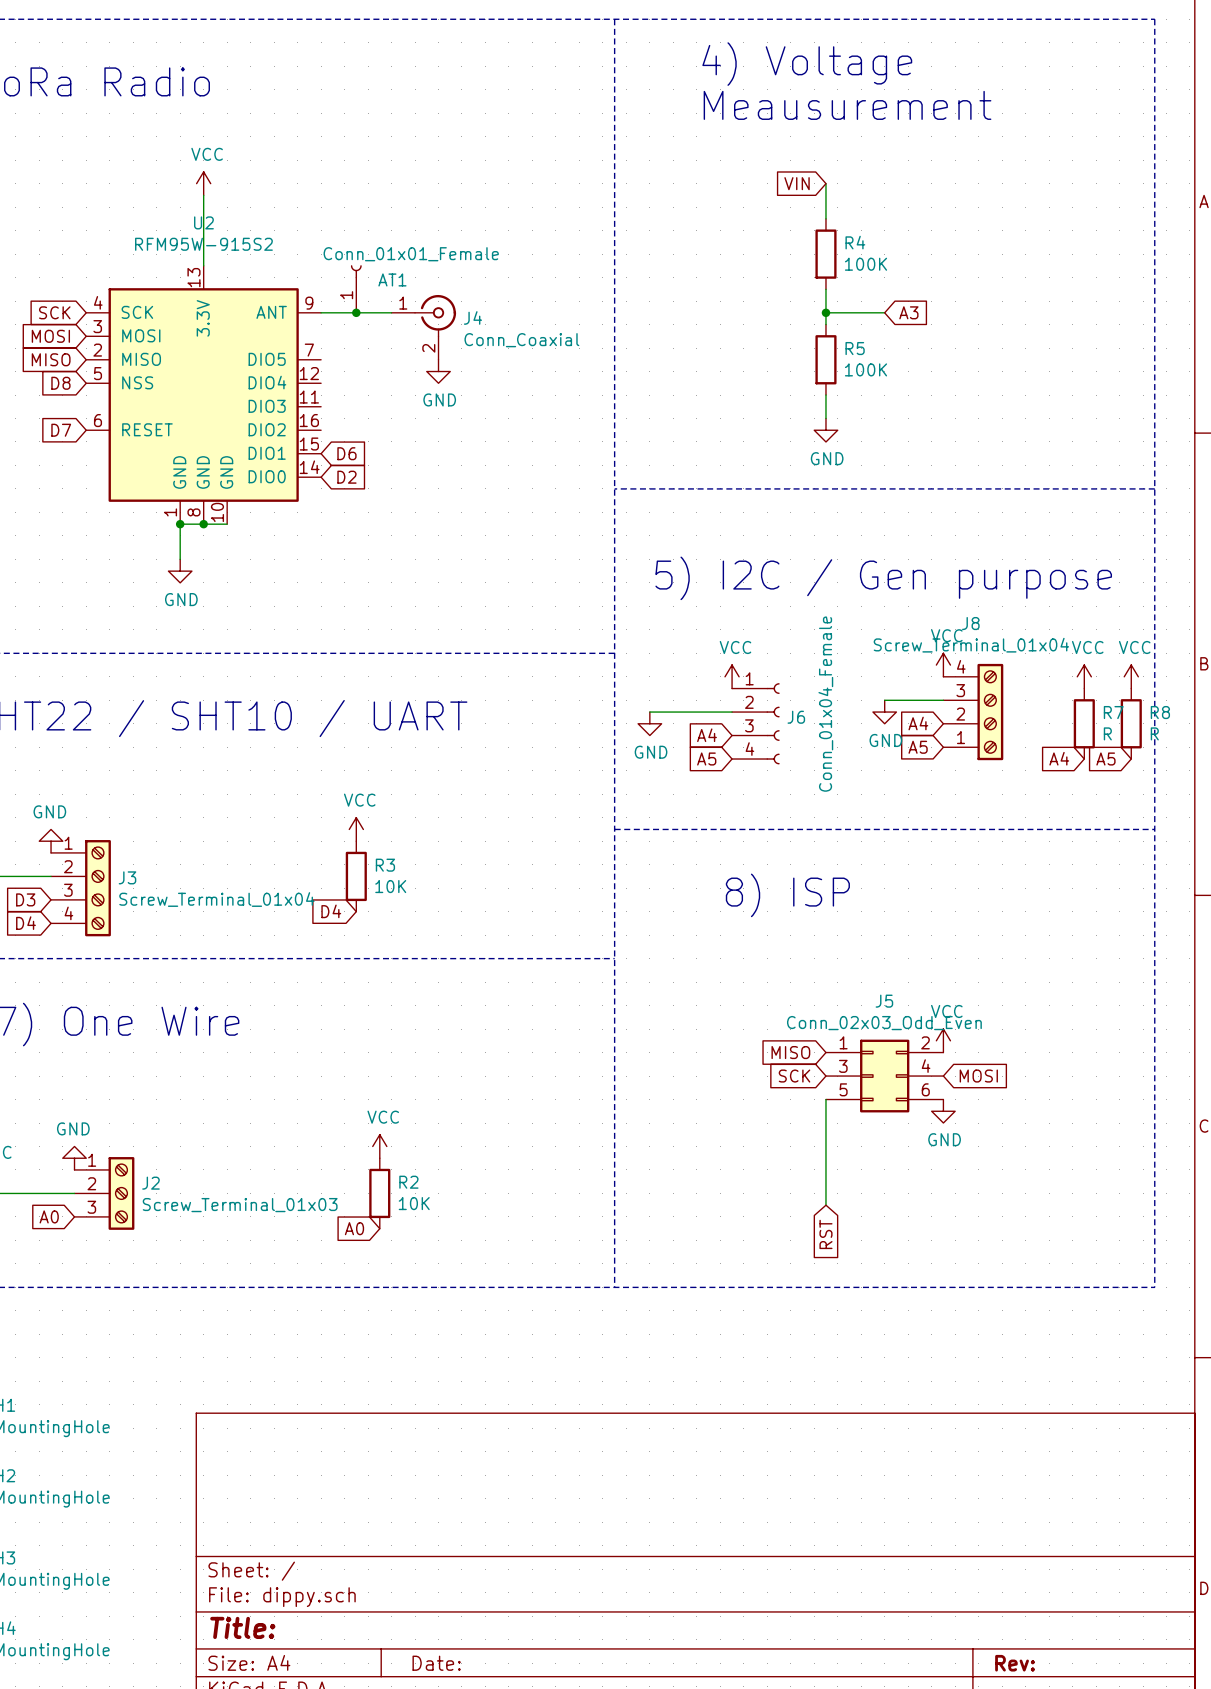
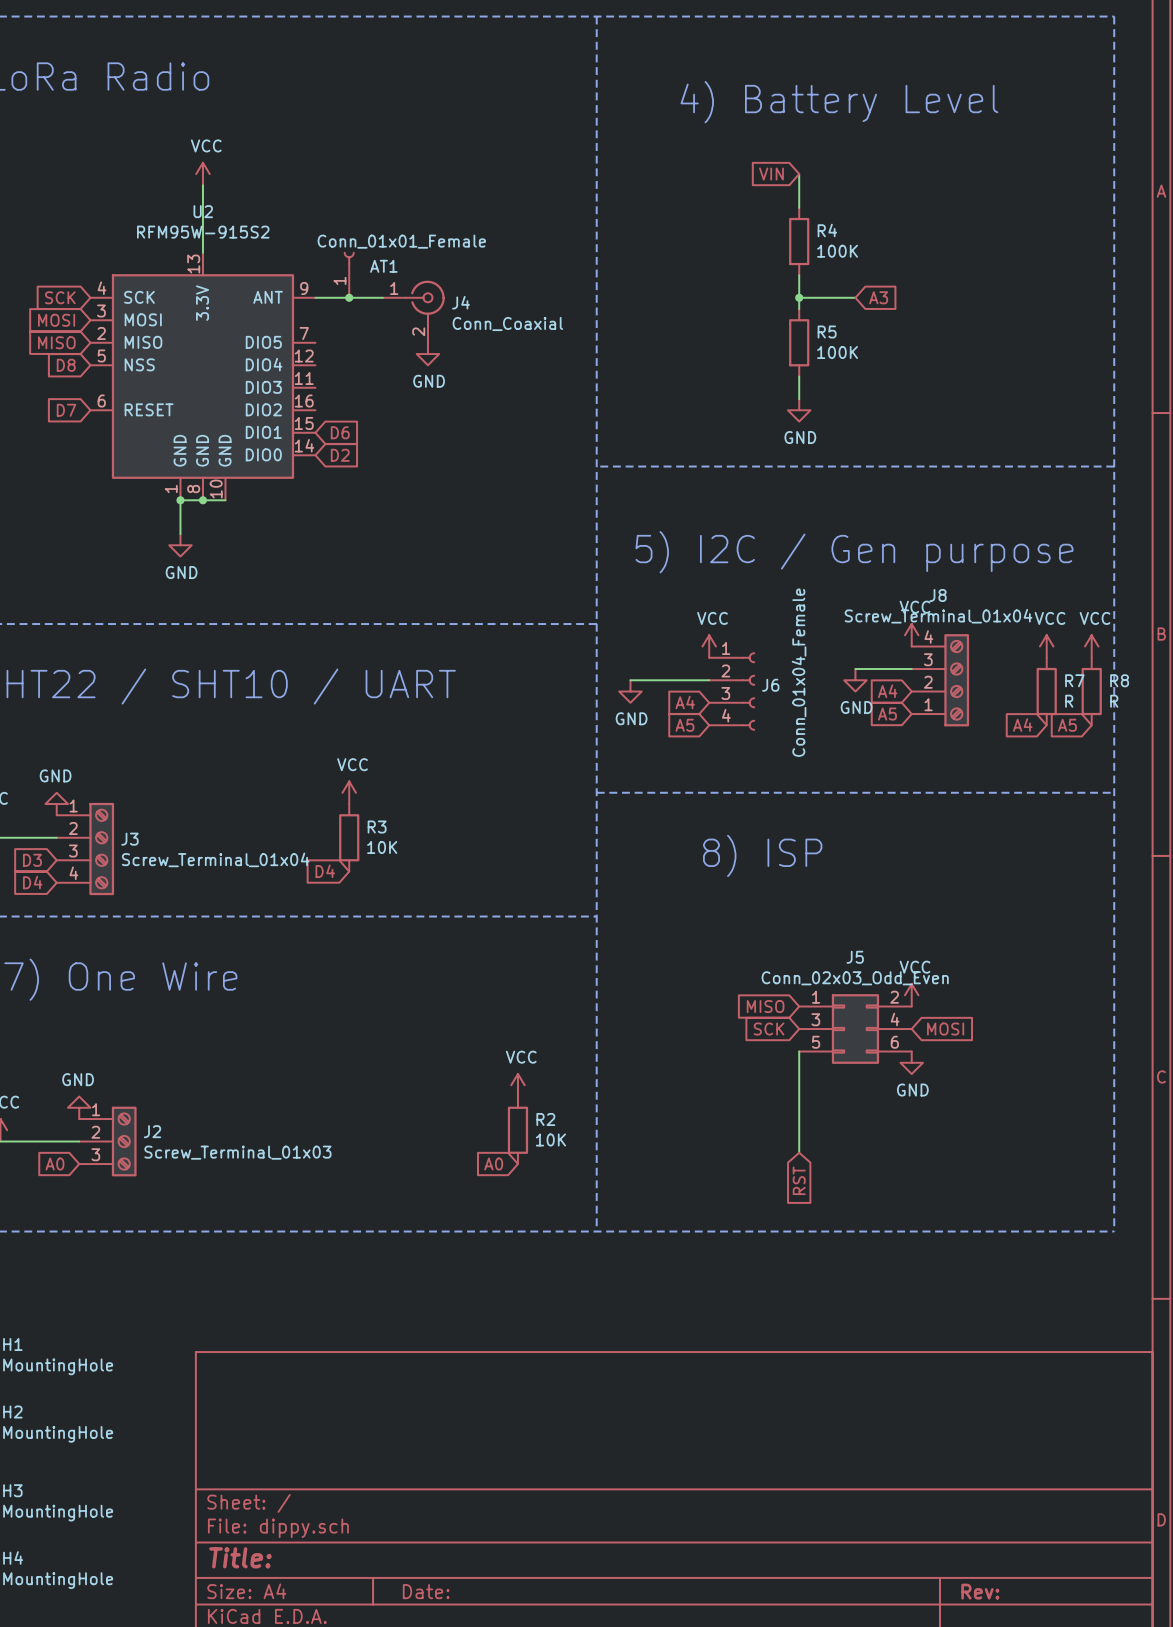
text: 4) Voltage (807, 64) -> none
text: Meausurement (847, 105) -> 4) Battery Level (839, 102)
power symbol position: VCC (379, 1146) -> VCC (517, 1085)
R2 position: (379, 1193) -> (517, 1130)
global label position: A0 (354, 1228) -> A0 (493, 1164)

